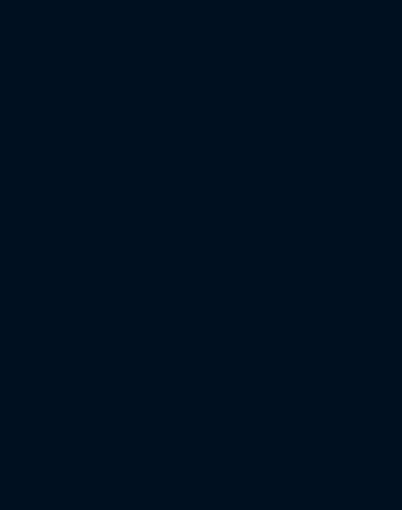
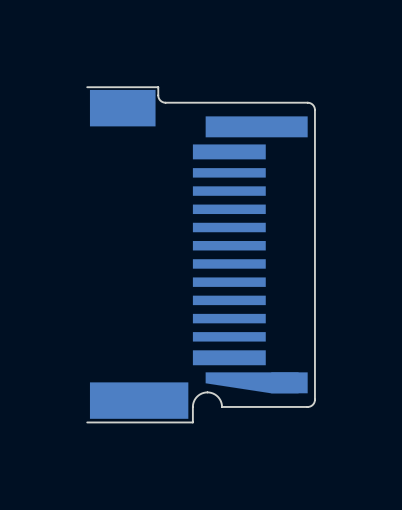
part: none -> (201, 254)

